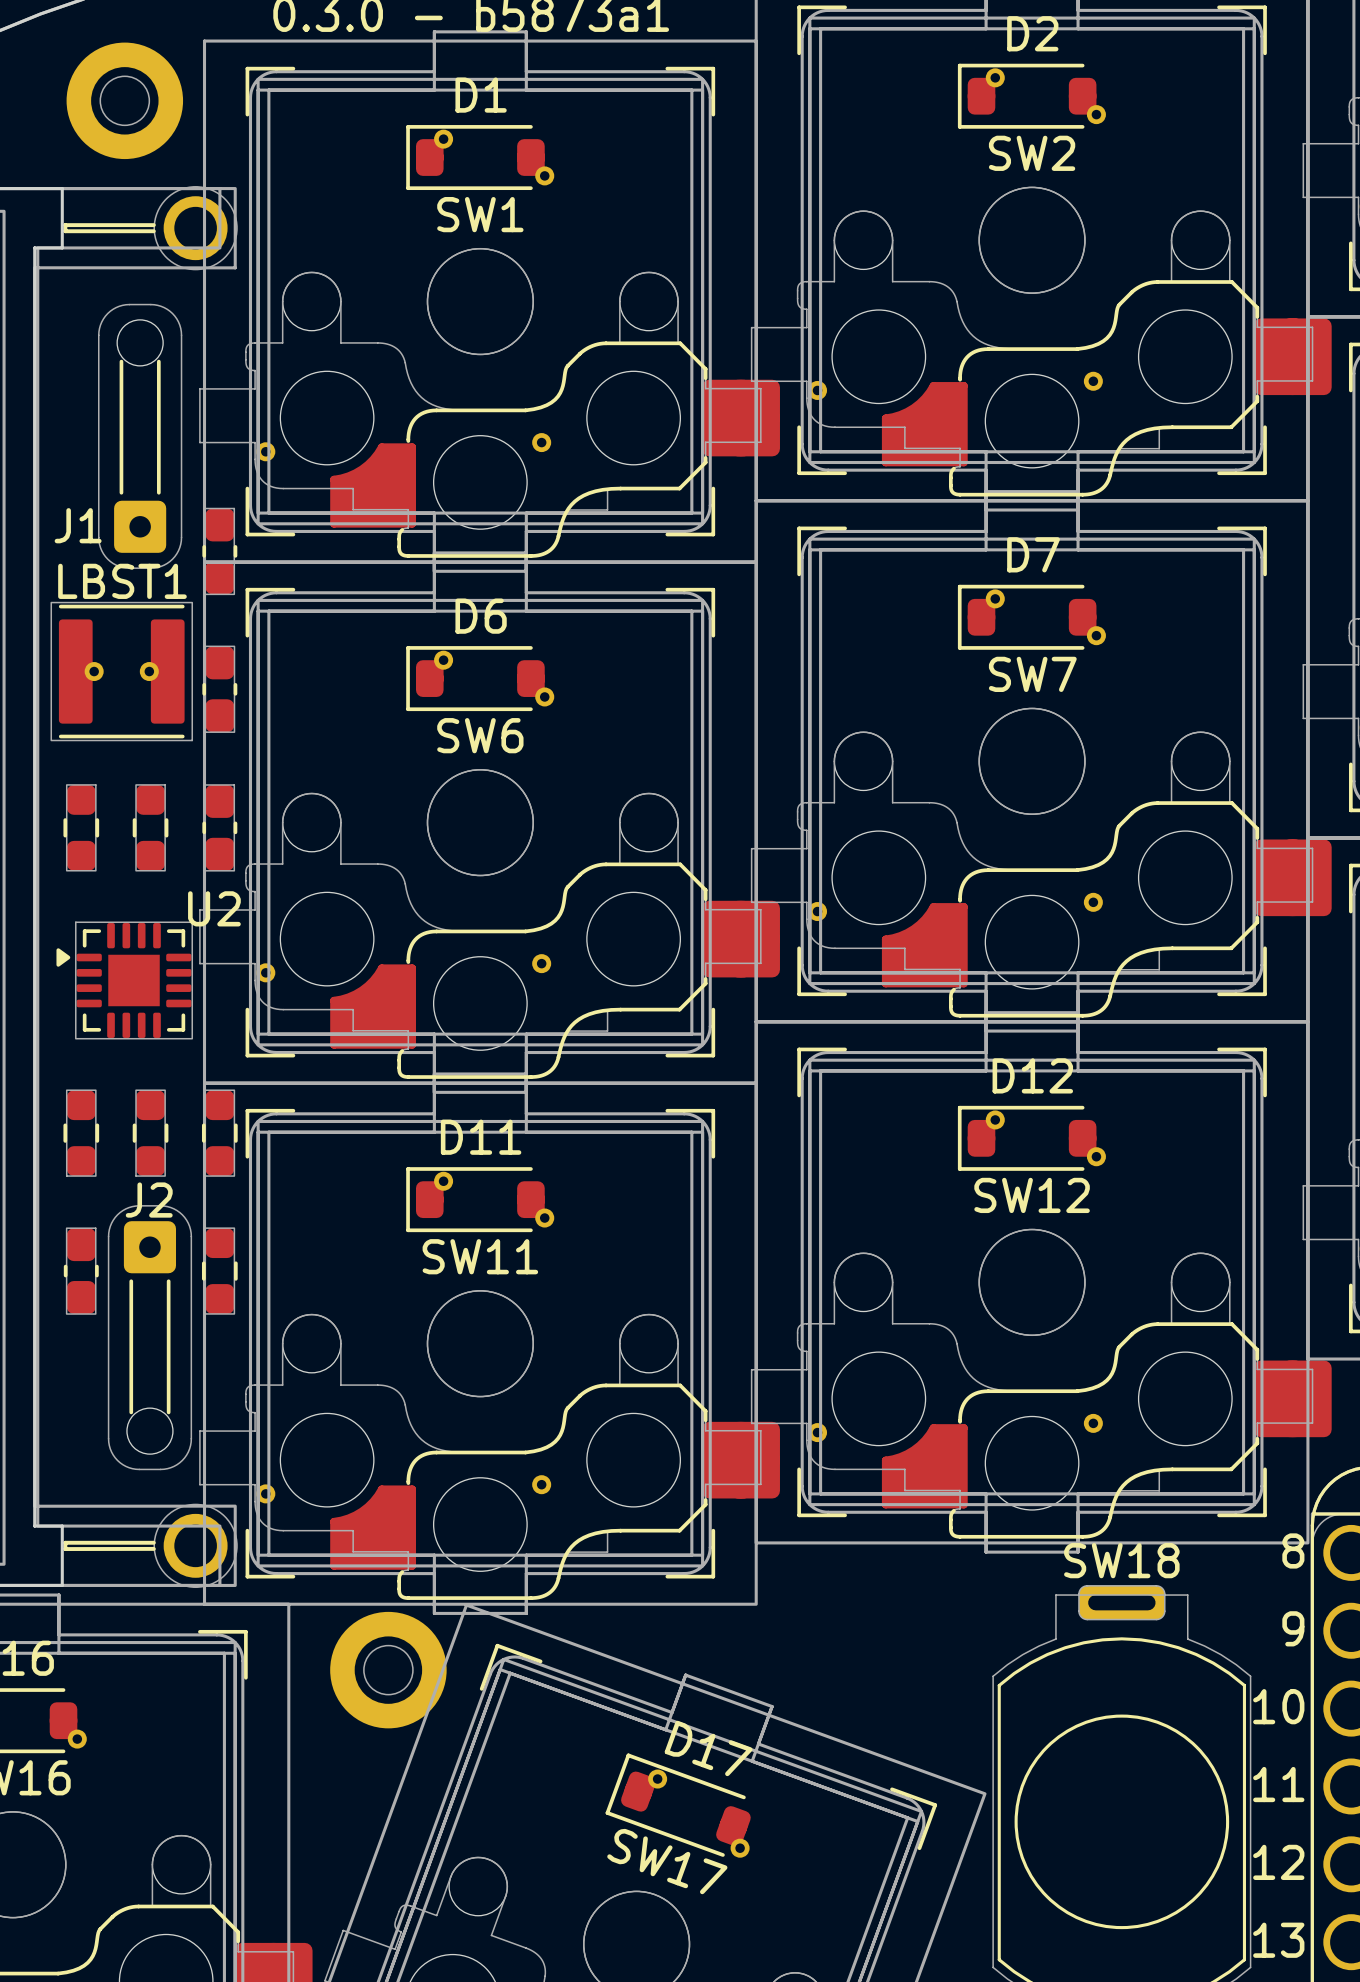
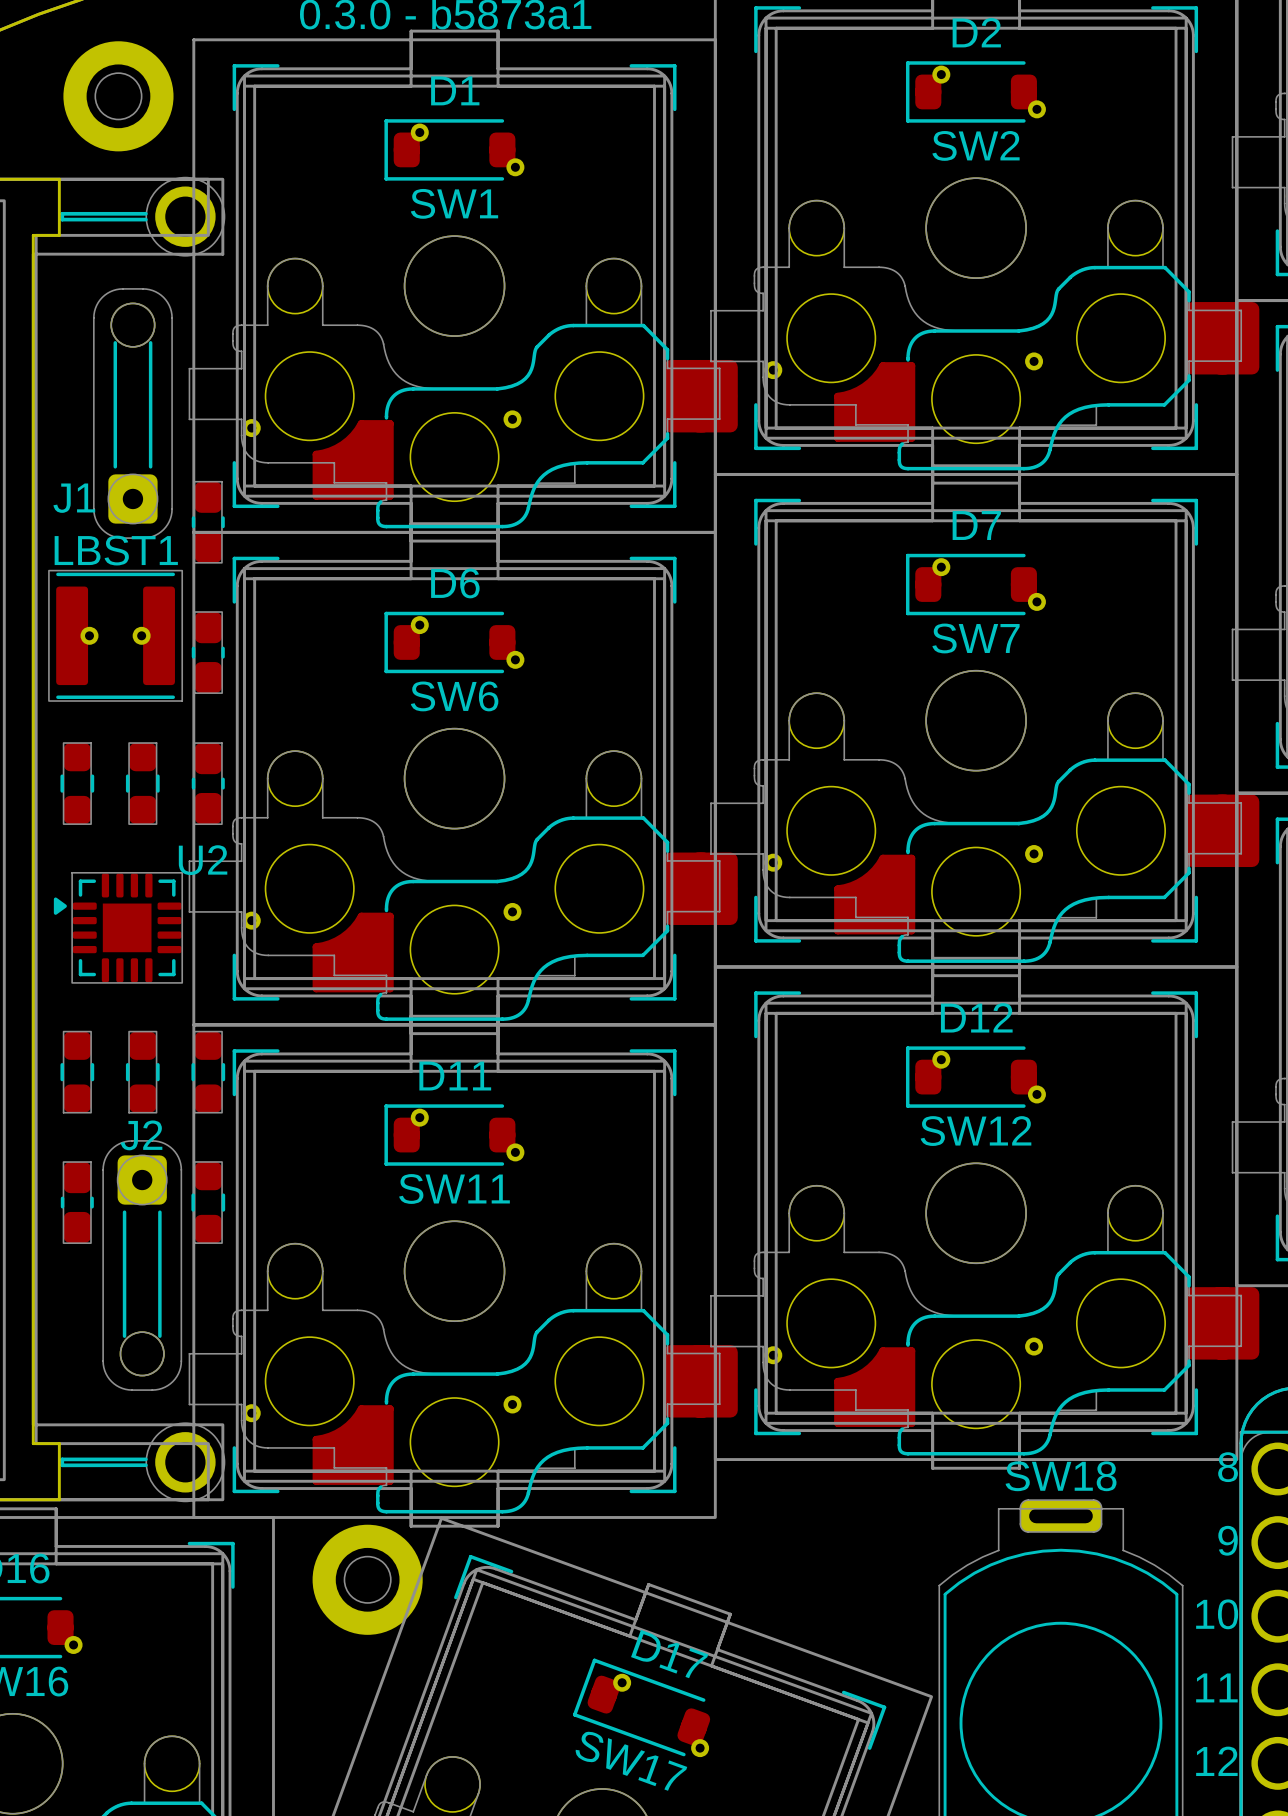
J1 footprint: [98, 303, 183, 569] -> [93, 288, 173, 539]
J2 footprint: [107, 1205, 193, 1471] -> [102, 1140, 183, 1391]

